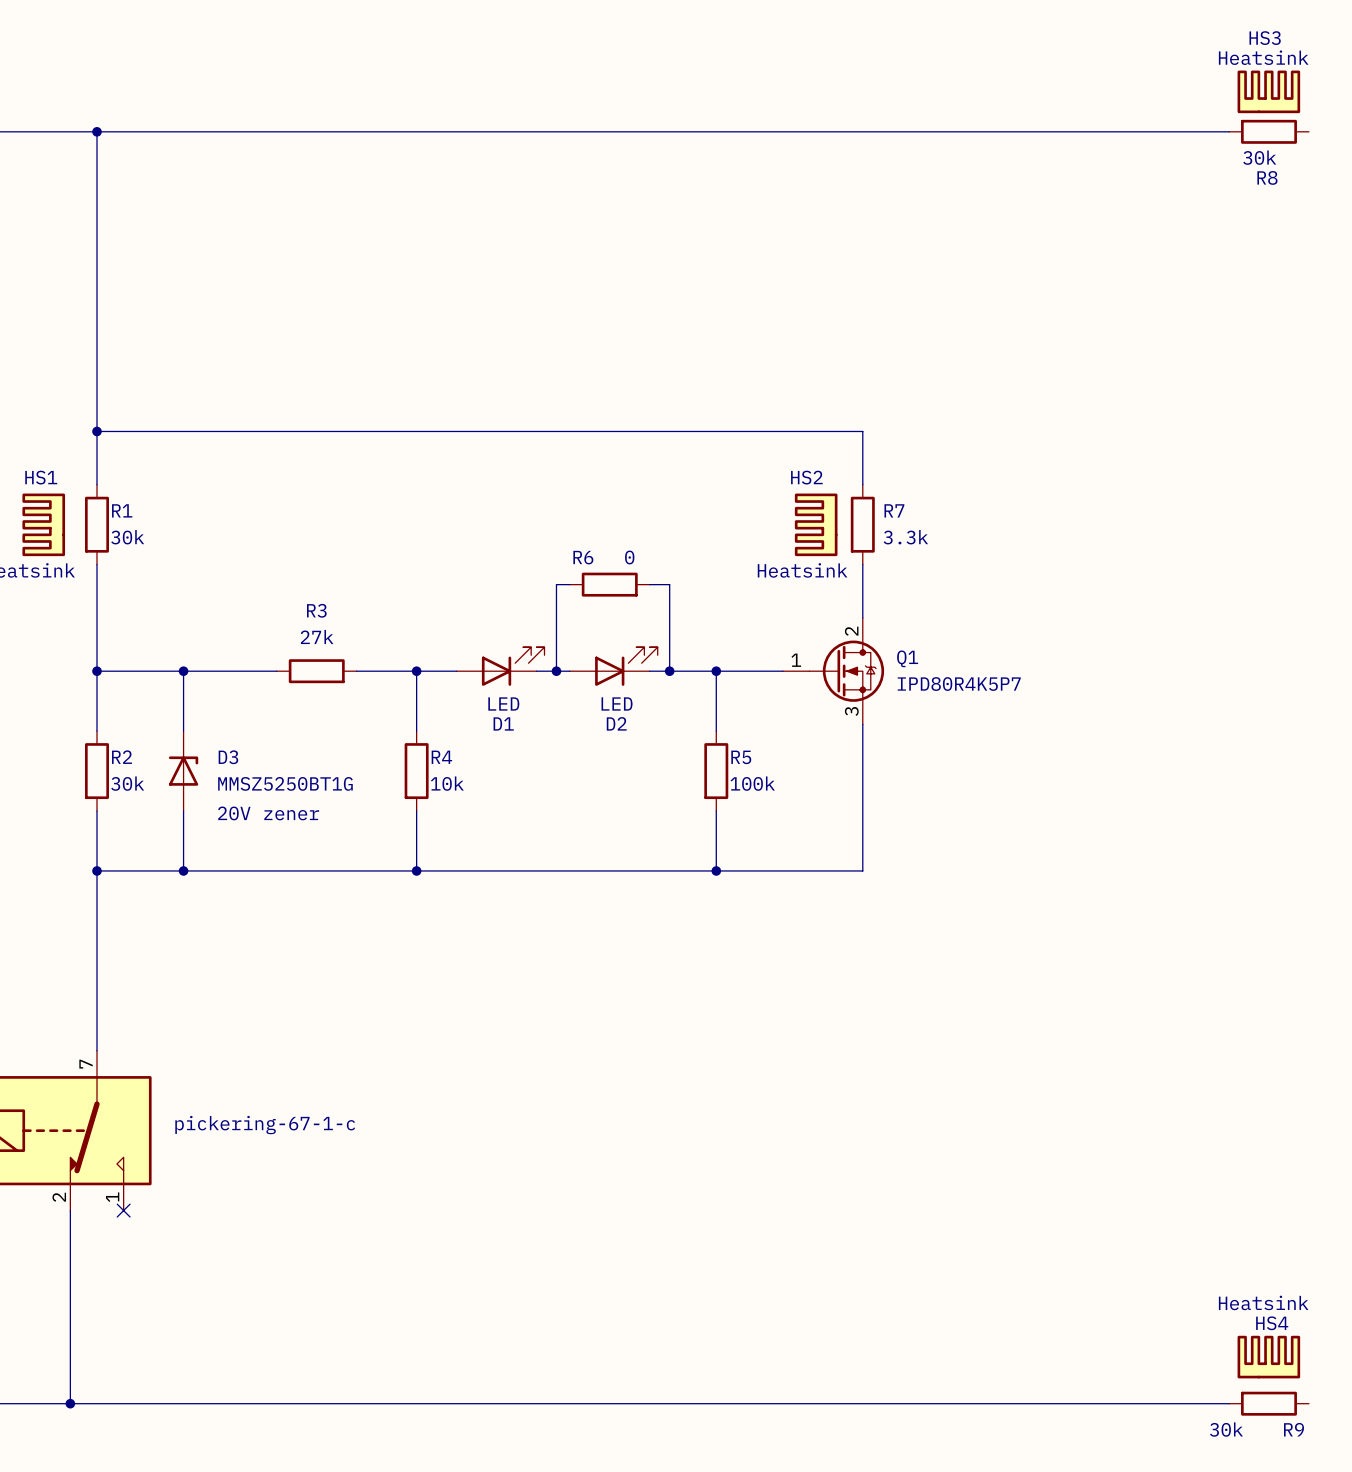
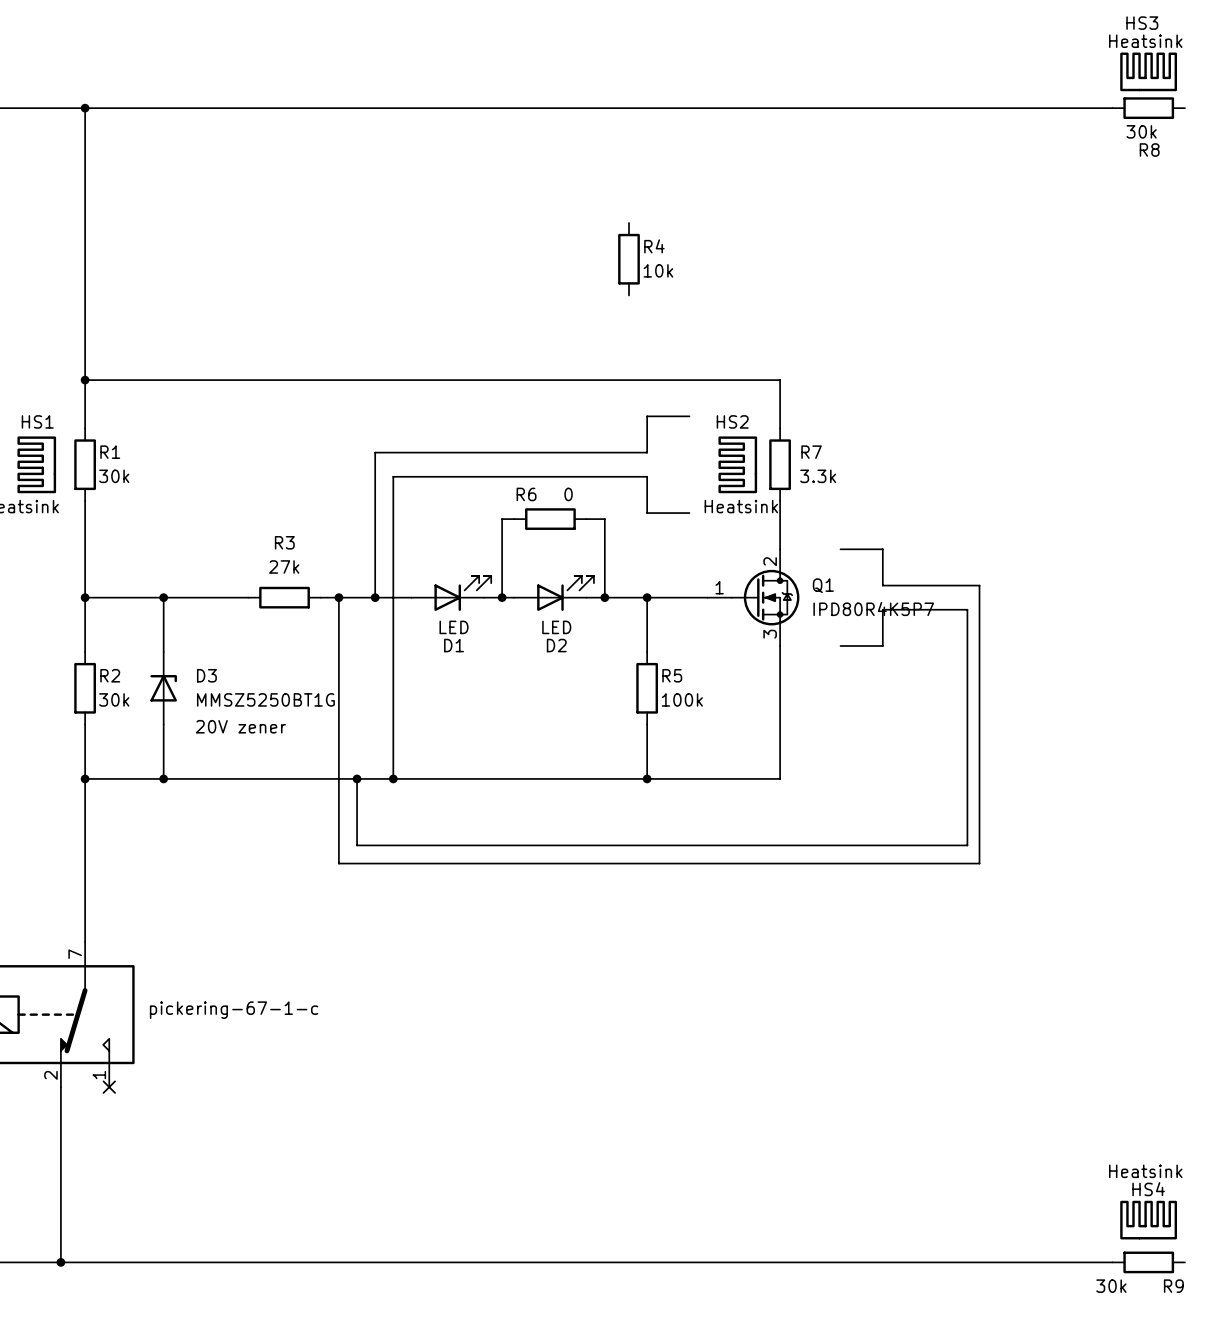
HS2 value position: Heatsink (802, 570) -> Heatsink (741, 506)
wire: none -> (689, 513) (647, 513) (647, 476) (393, 476) (393, 778)
wire: none -> (840, 549) (882, 549) (882, 585) (979, 585) (979, 863) (338, 863) (338, 597)
junction: none -> (338, 597)
wire: (416, 671) (416, 731) -> (375, 597) (375, 452) (647, 452) (647, 416) (689, 416)
wire: none -> (840, 645) (882, 645) (882, 609) (967, 609) (967, 845) (357, 845) (357, 778)
R4 position: (416, 771) -> (629, 259)
wire: (416, 811) (416, 870) -> none
junction: none -> (357, 778)
junction: (416, 870) -> none
junction: none -> (393, 778)

